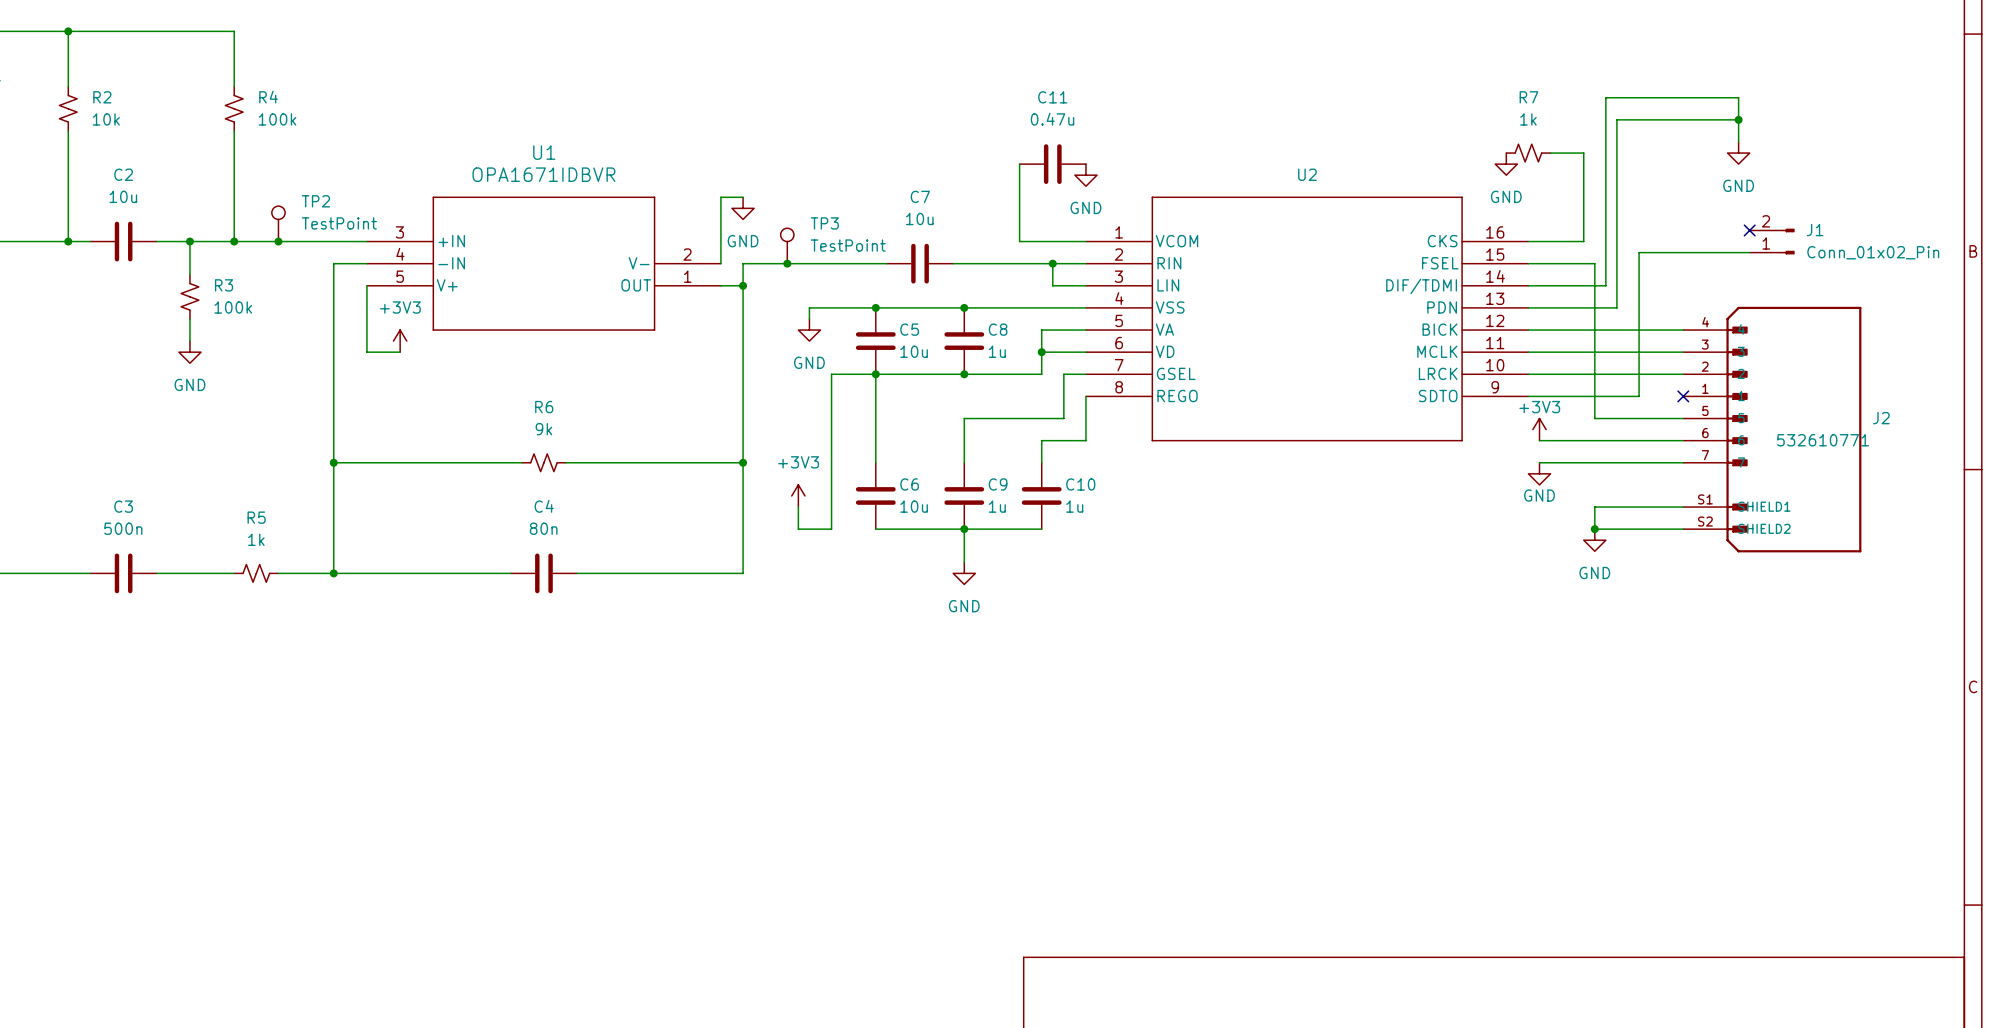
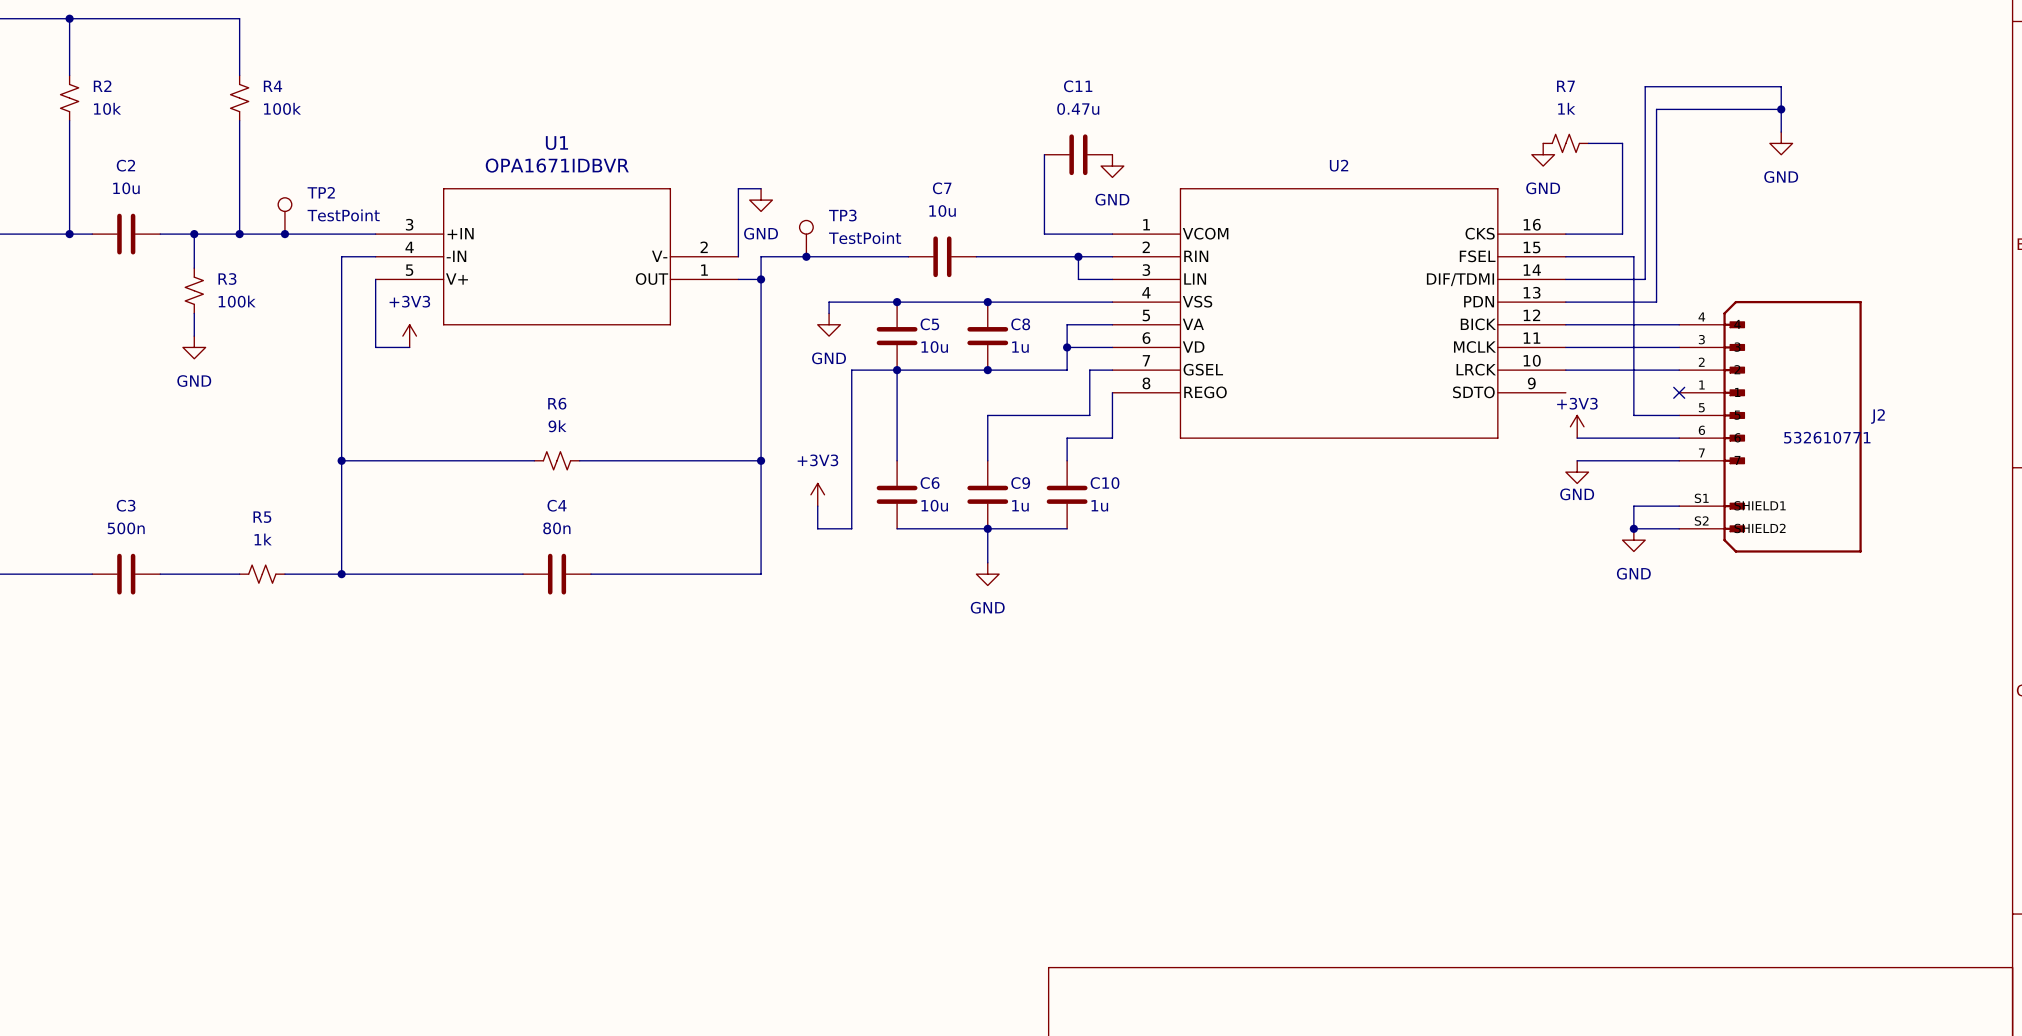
no-connect mark: (1749, 230) -> none
J1: Conn_01x02_Pin (1772, 241) -> none
wire: (1749, 252) (1639, 252) (1639, 396) (1528, 396) -> none
no-connect mark position: (1683, 396) -> (1679, 392)
J2 position: (1772, 429) -> (1770, 426)

